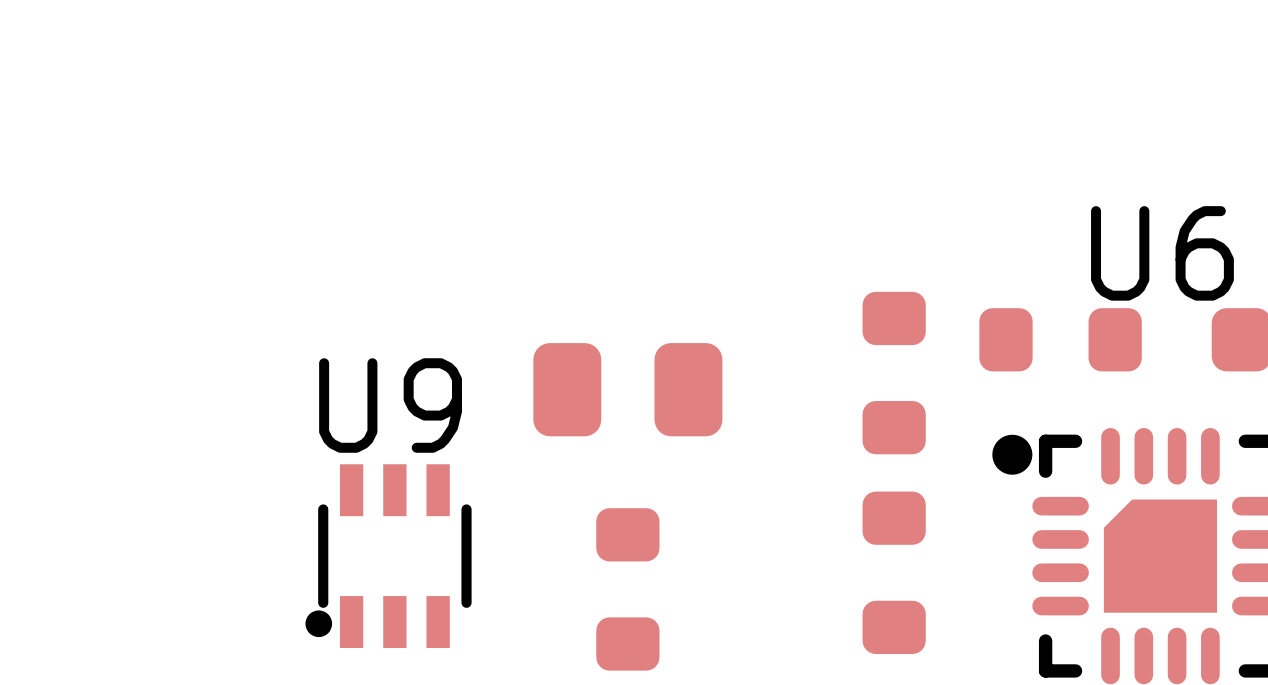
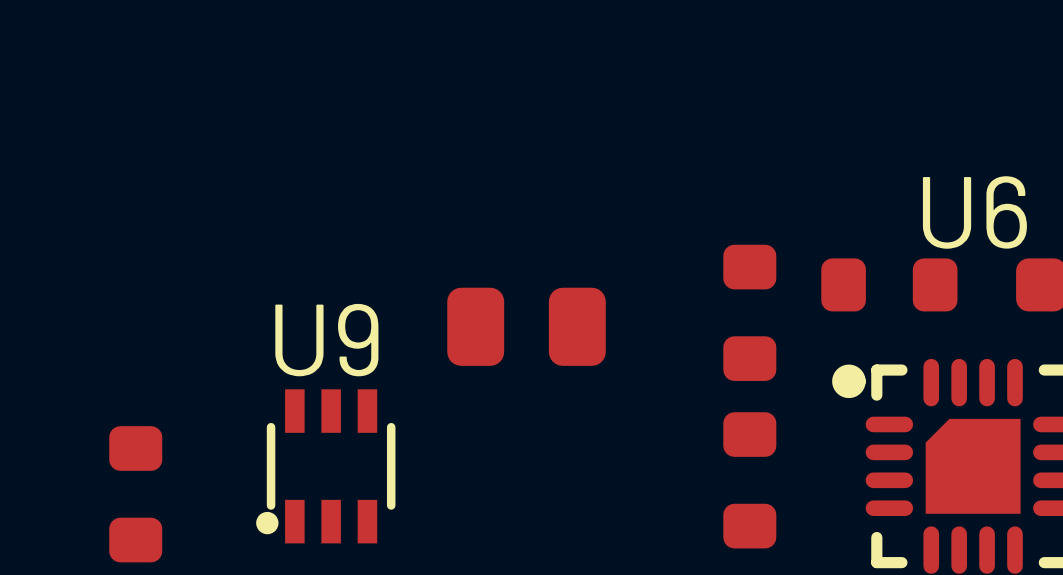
part position: (627, 589) -> (135, 494)

